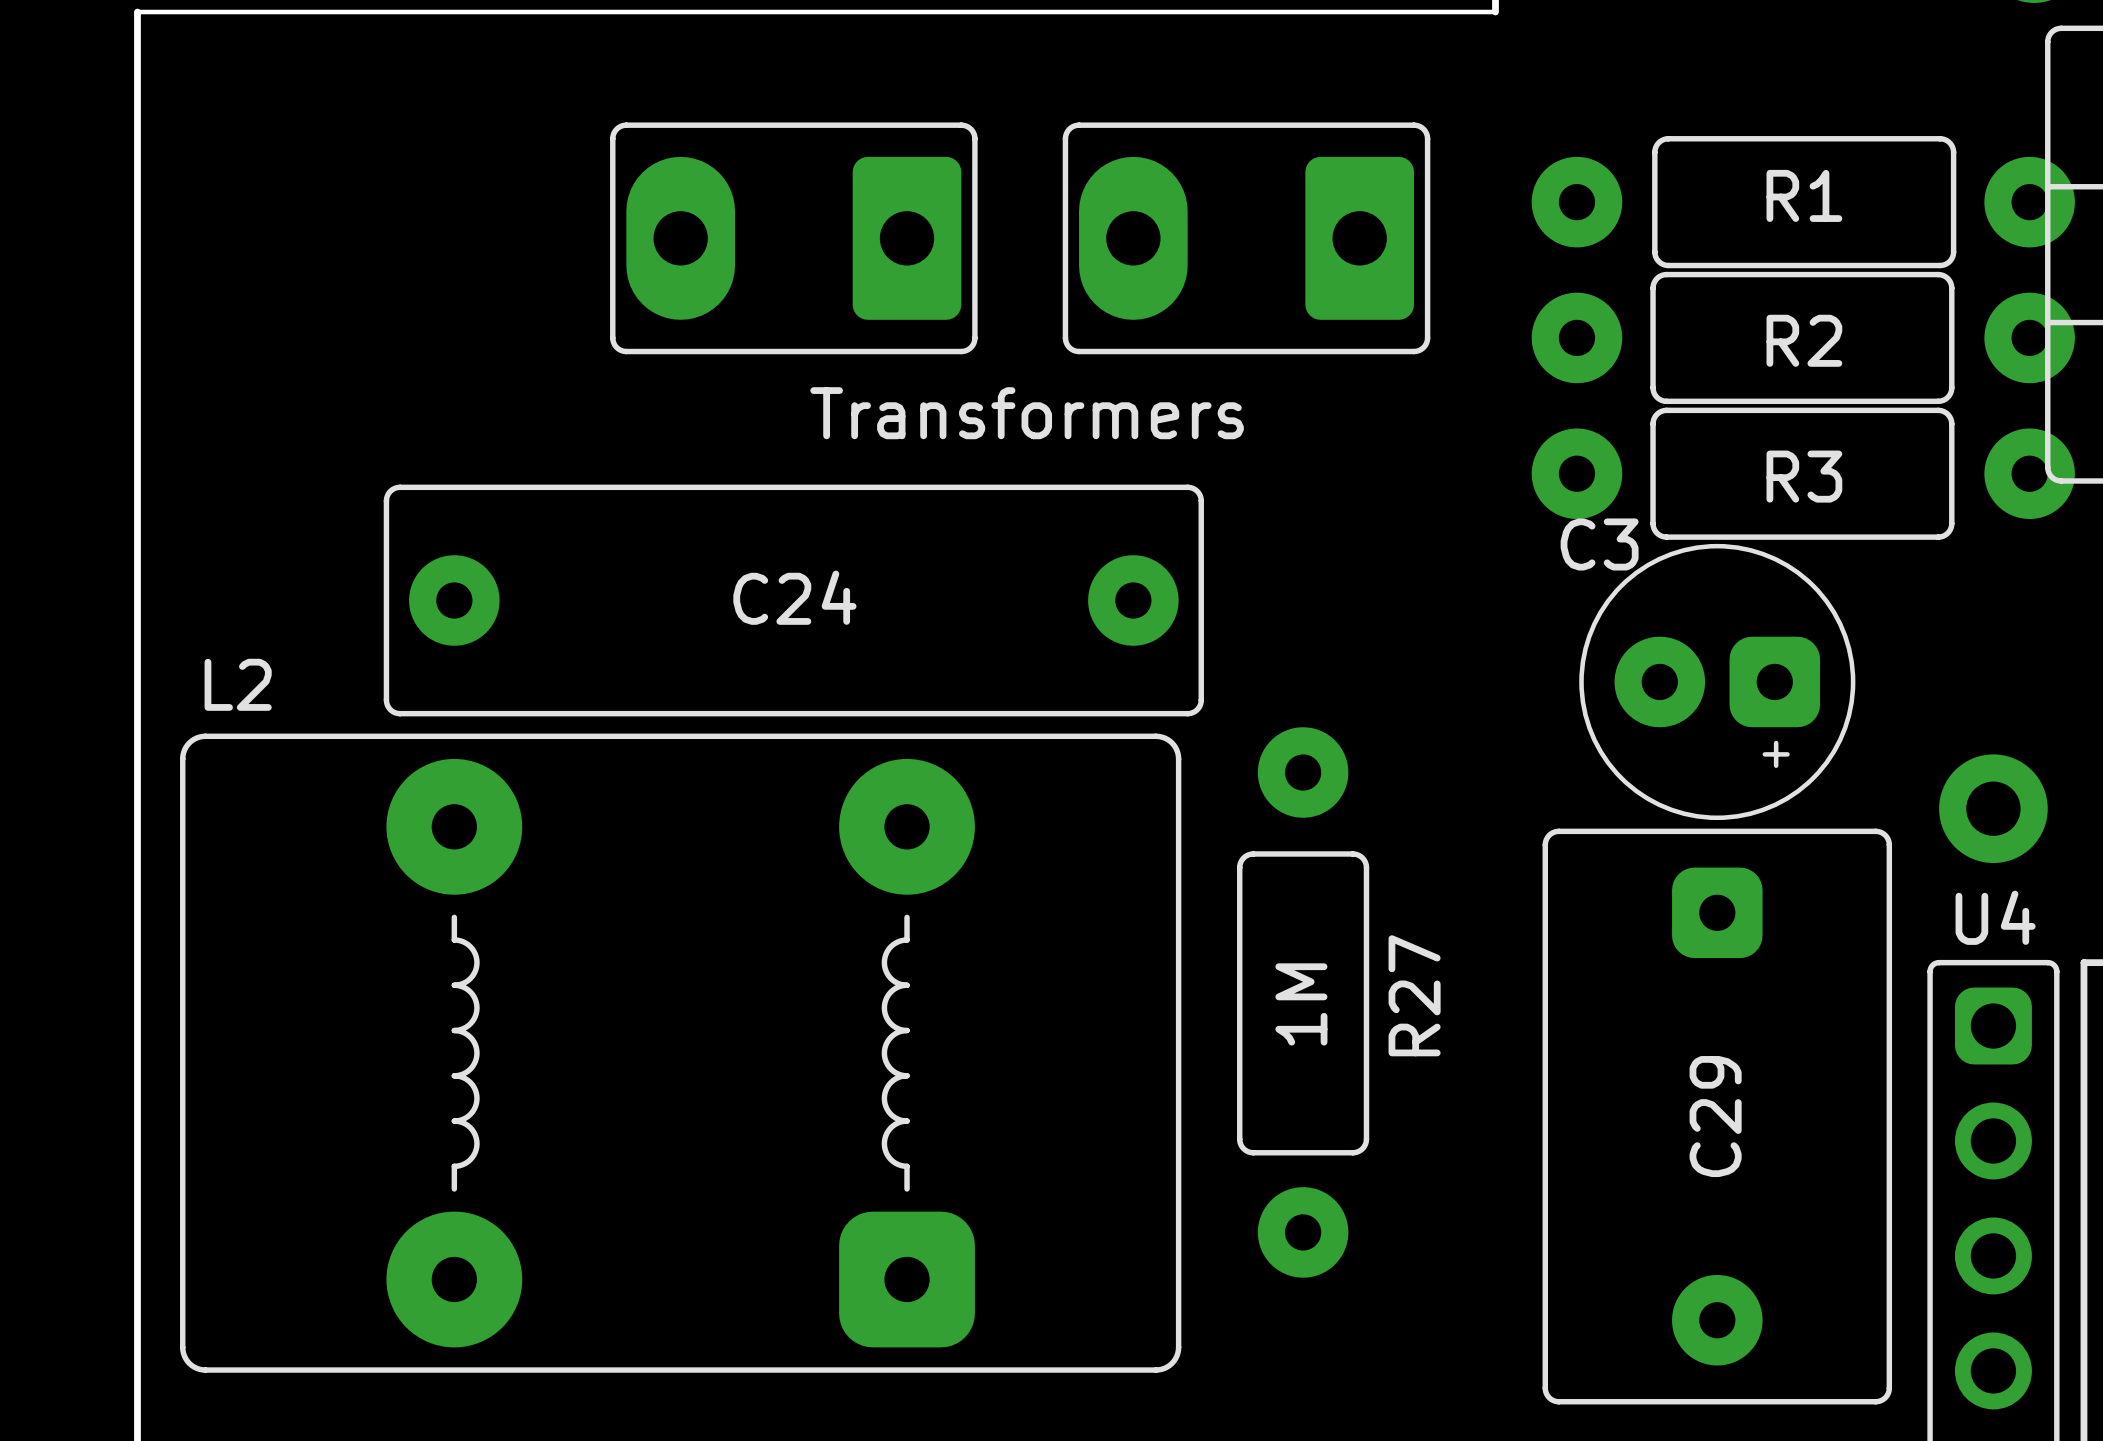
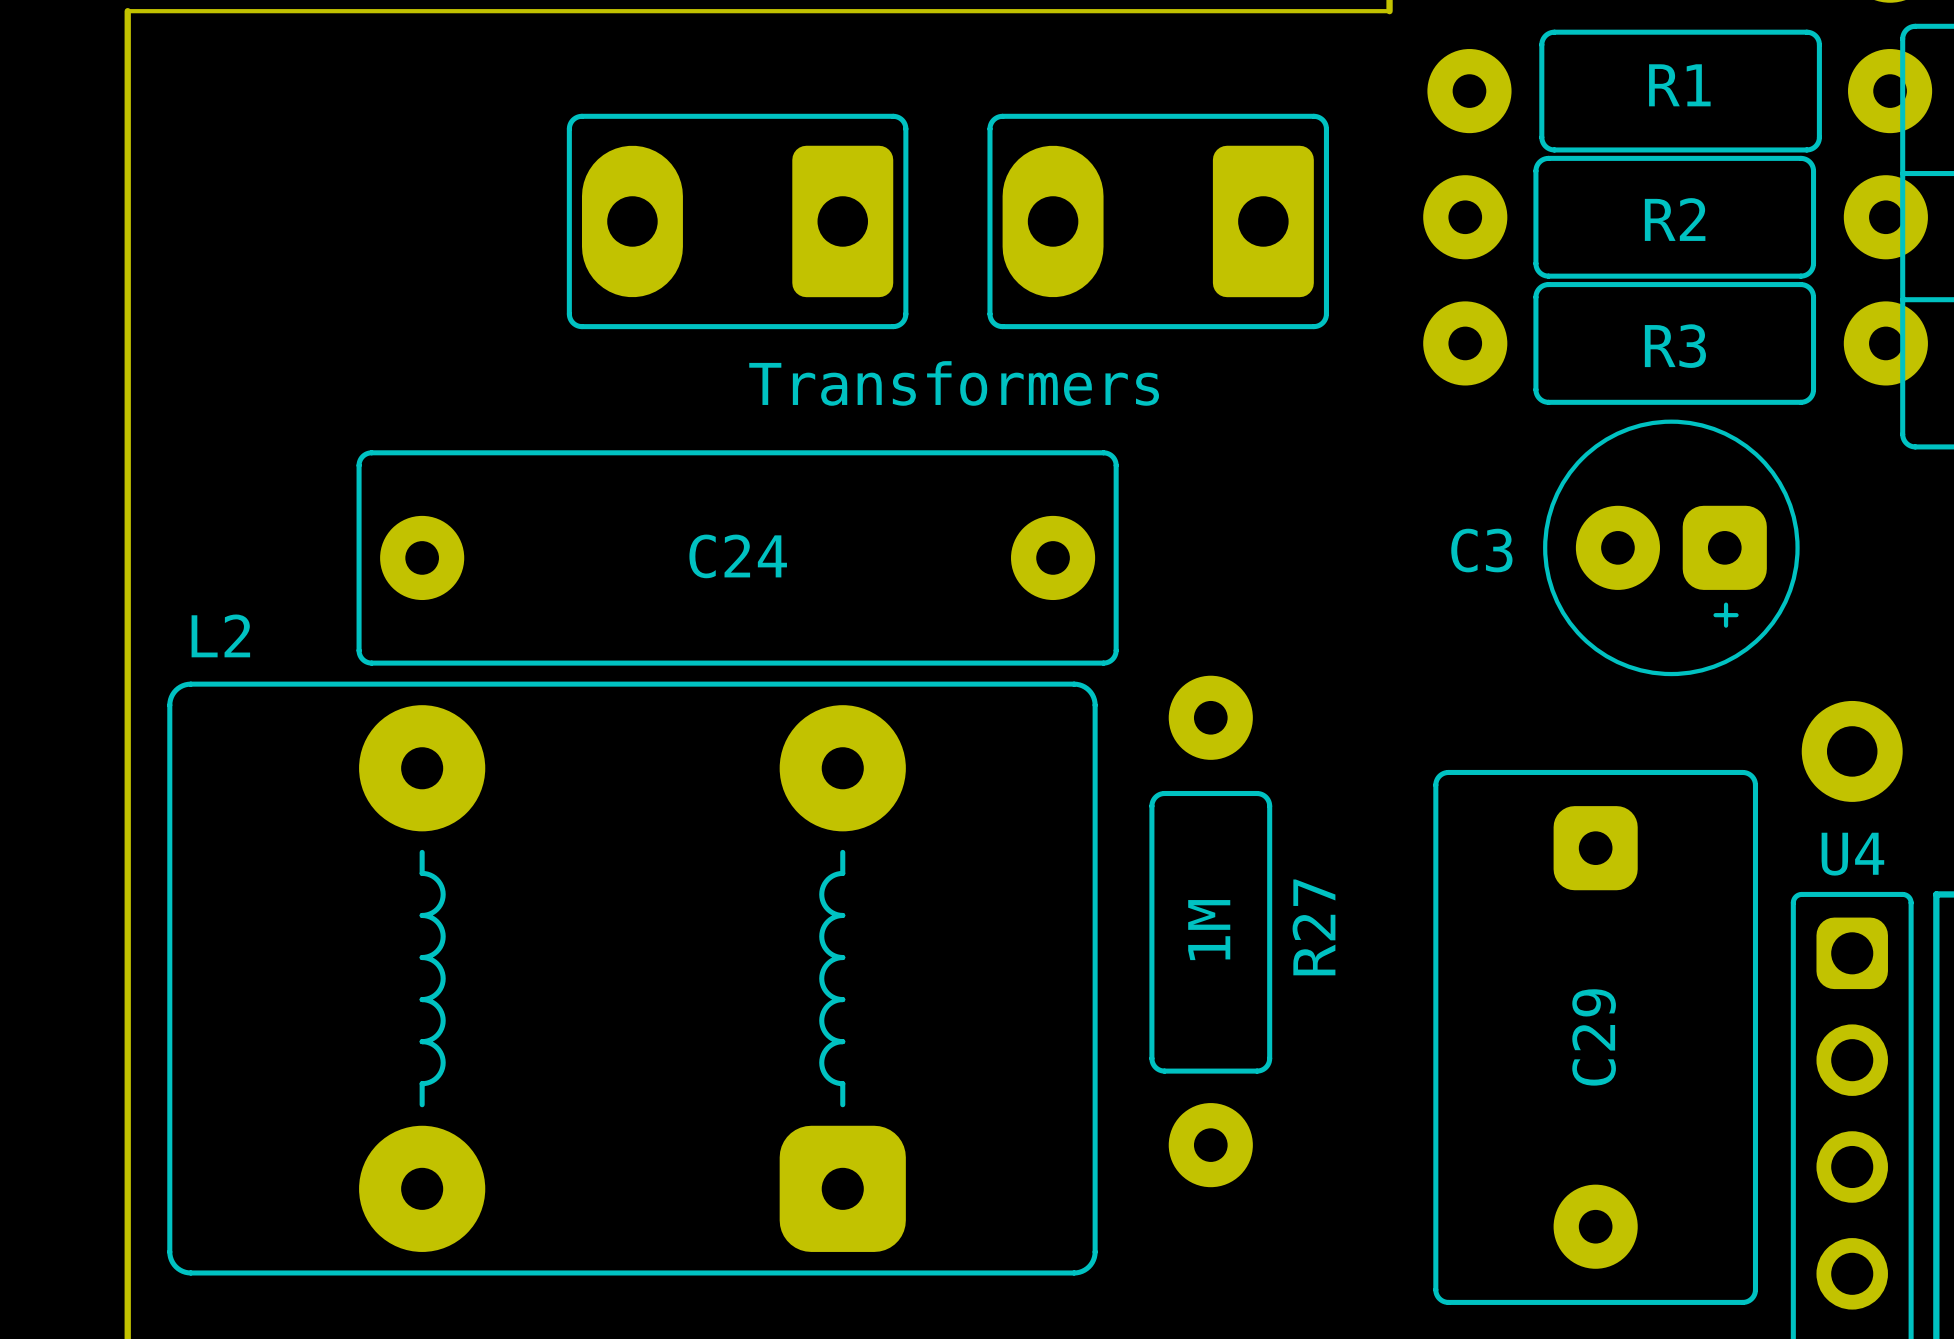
R1 position: (1803, 202) -> (1679, 91)
R2 position: (1803, 337) -> (1675, 217)
R3 position: (1803, 473) -> (1675, 343)
C3 name position: C3 (1599, 544) -> C3 (1481, 550)
C3 position: (1717, 681) -> (1671, 547)

